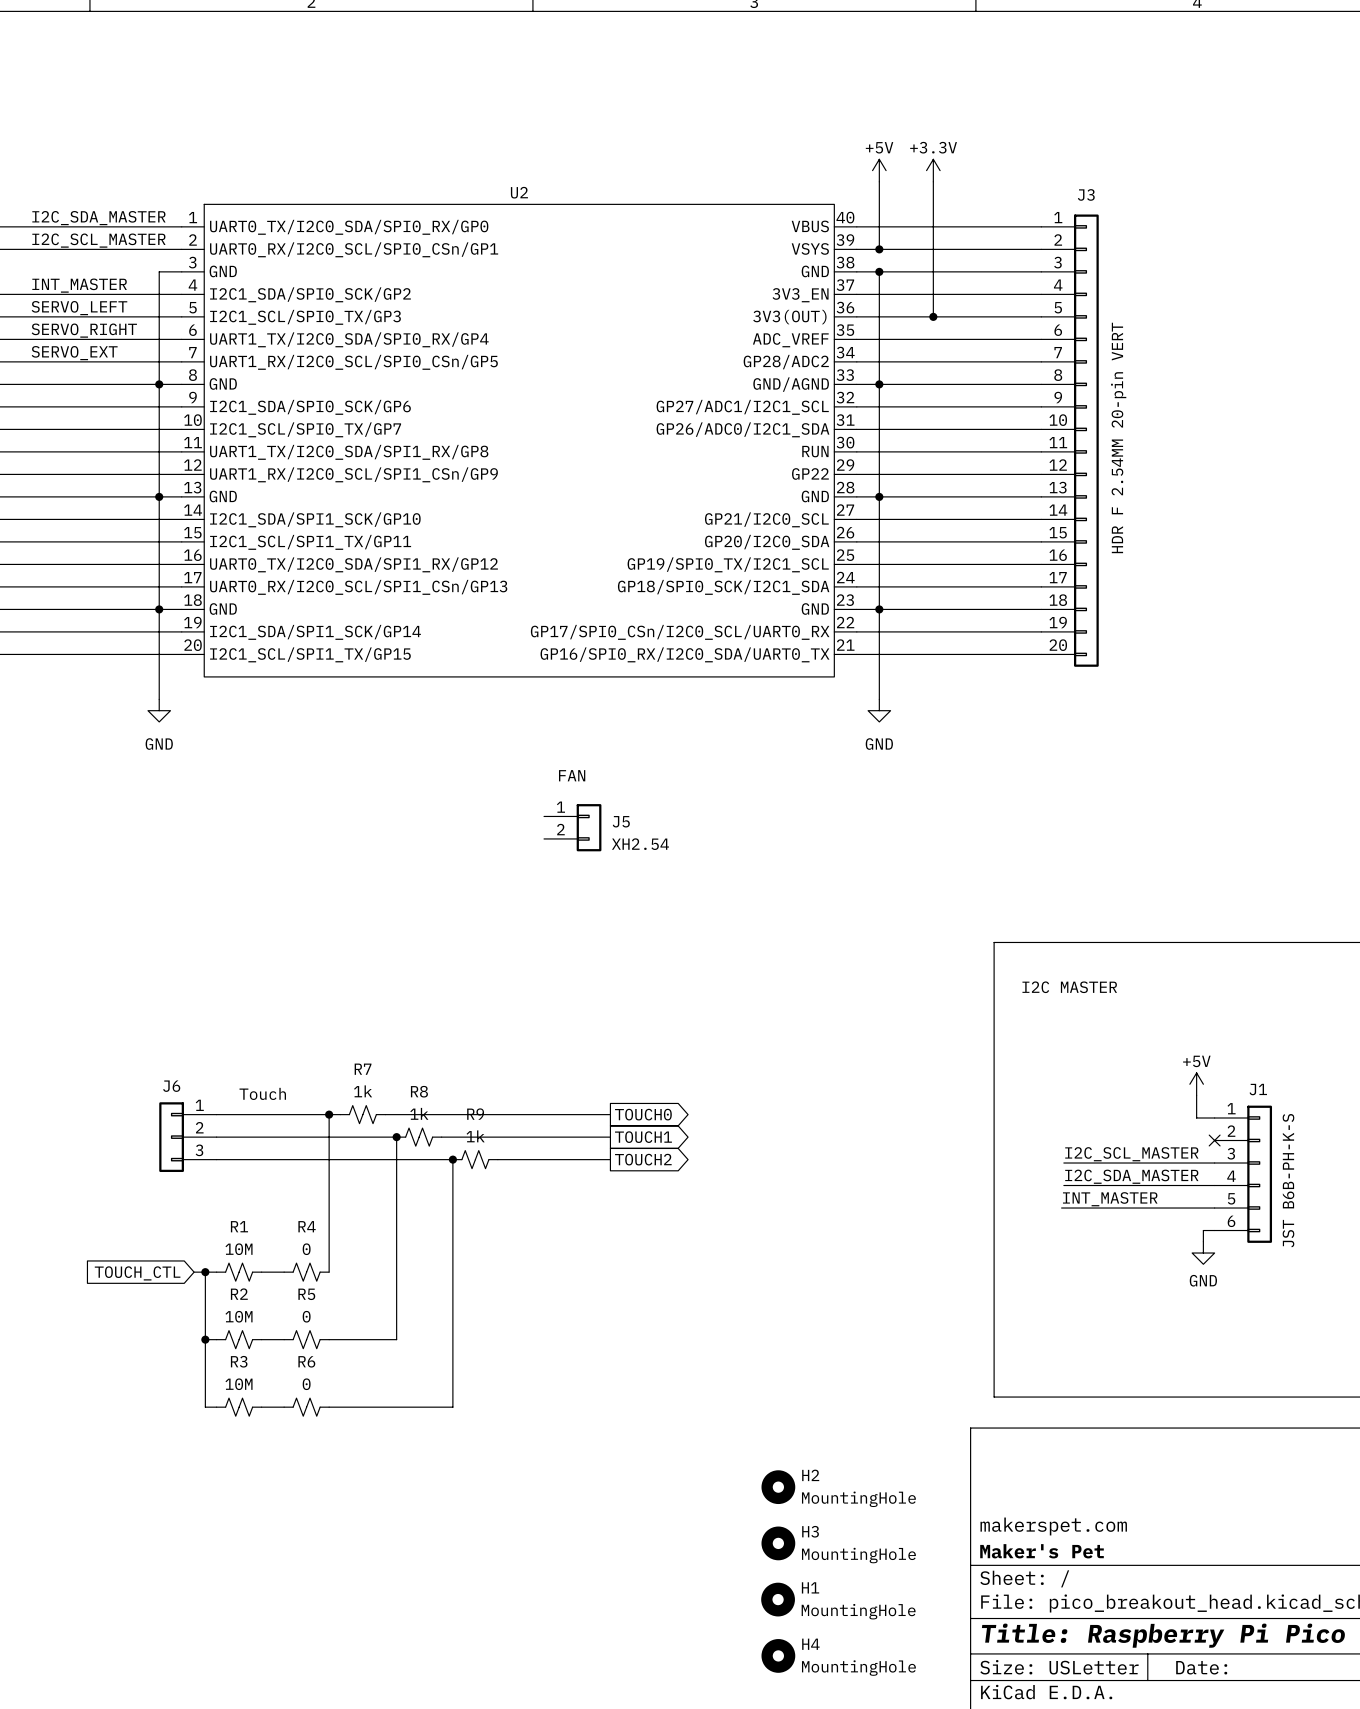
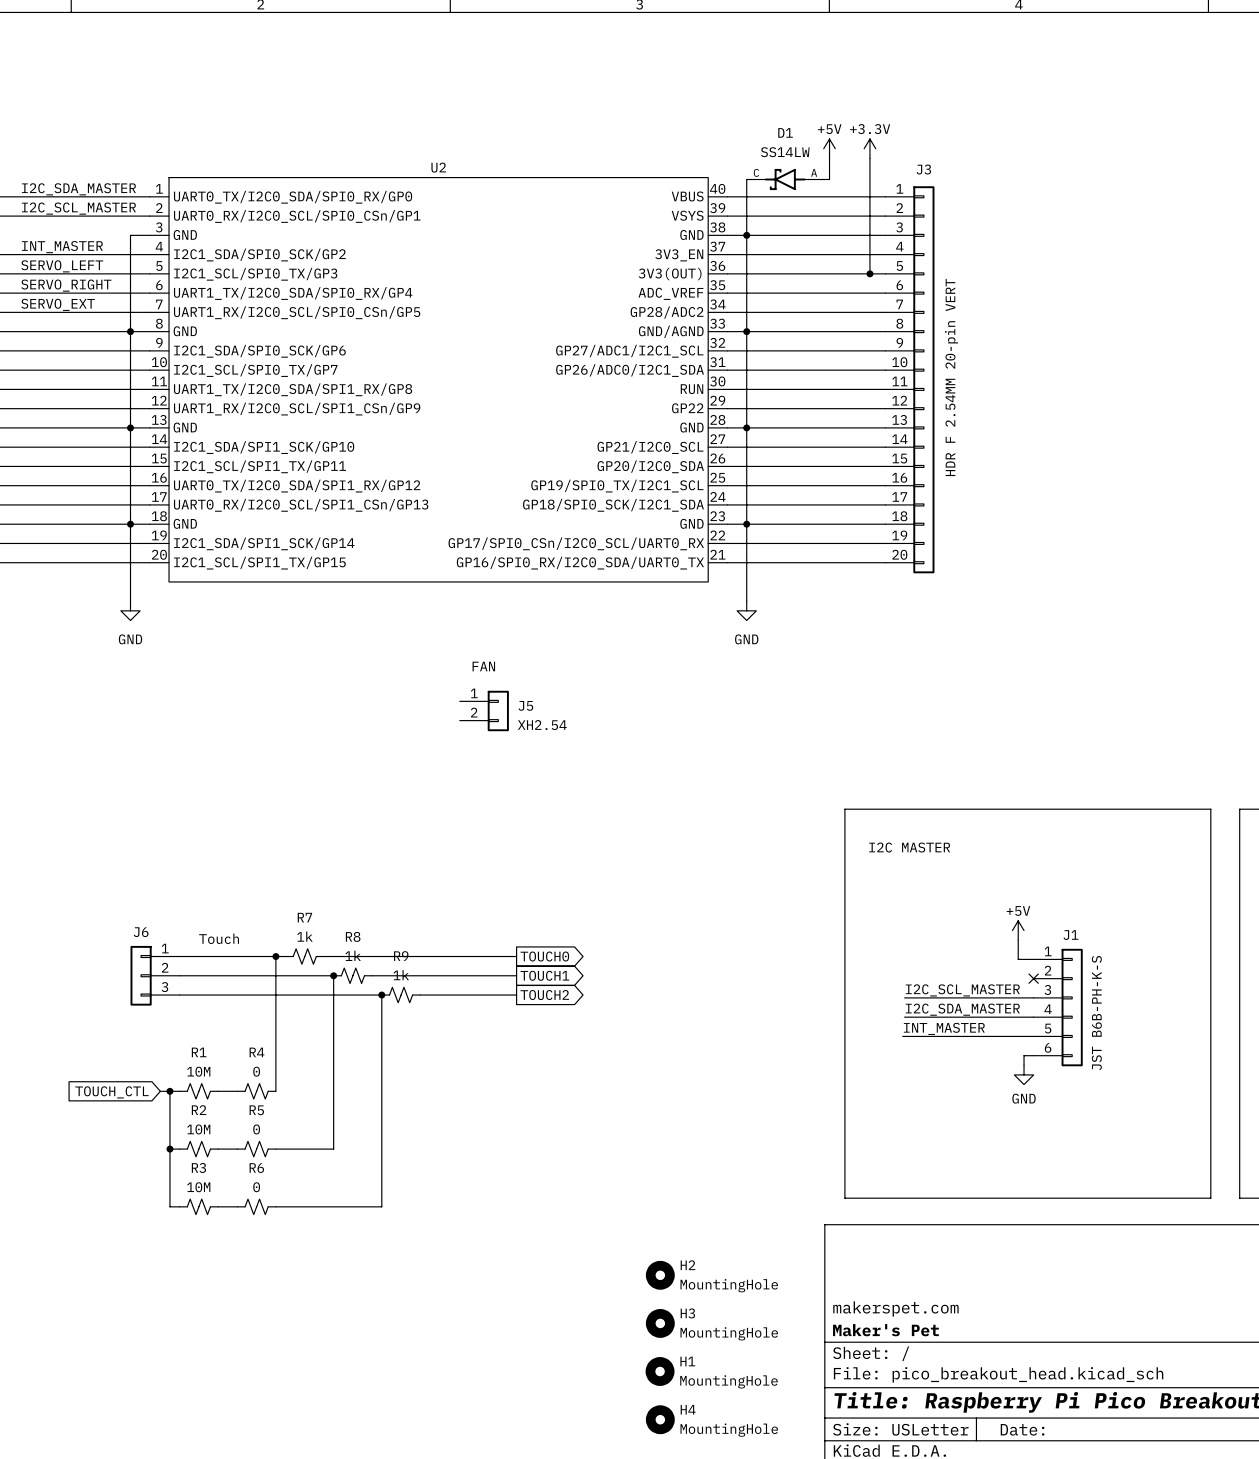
power symbol position: +5V (879, 170) -> +5V (829, 148)
power symbol position: +3.3V (933, 170) -> +3.3V (869, 148)
wire: (879, 181) (879, 206) -> none
wire: (933, 181) (933, 316) -> (869, 158) (869, 273)
wire: none -> (829, 158) (829, 179) (823, 179)
D1: none -> SS14LW (785, 179)
wire: none -> (746, 216) (746, 235)
junction: (879, 249) -> none
junction: (933, 316) -> none
junction: none -> (869, 273)

